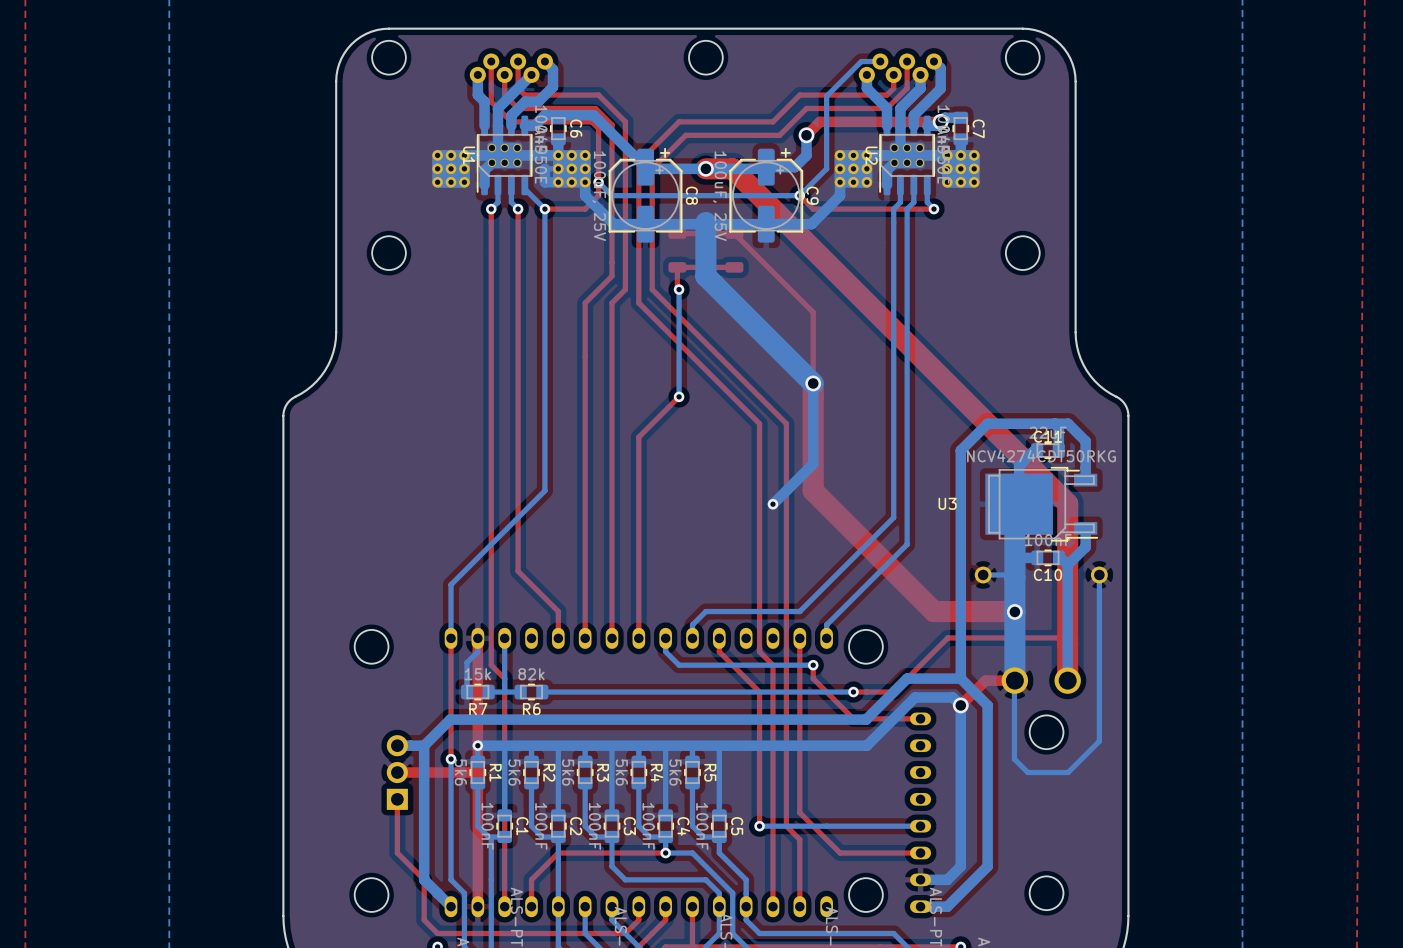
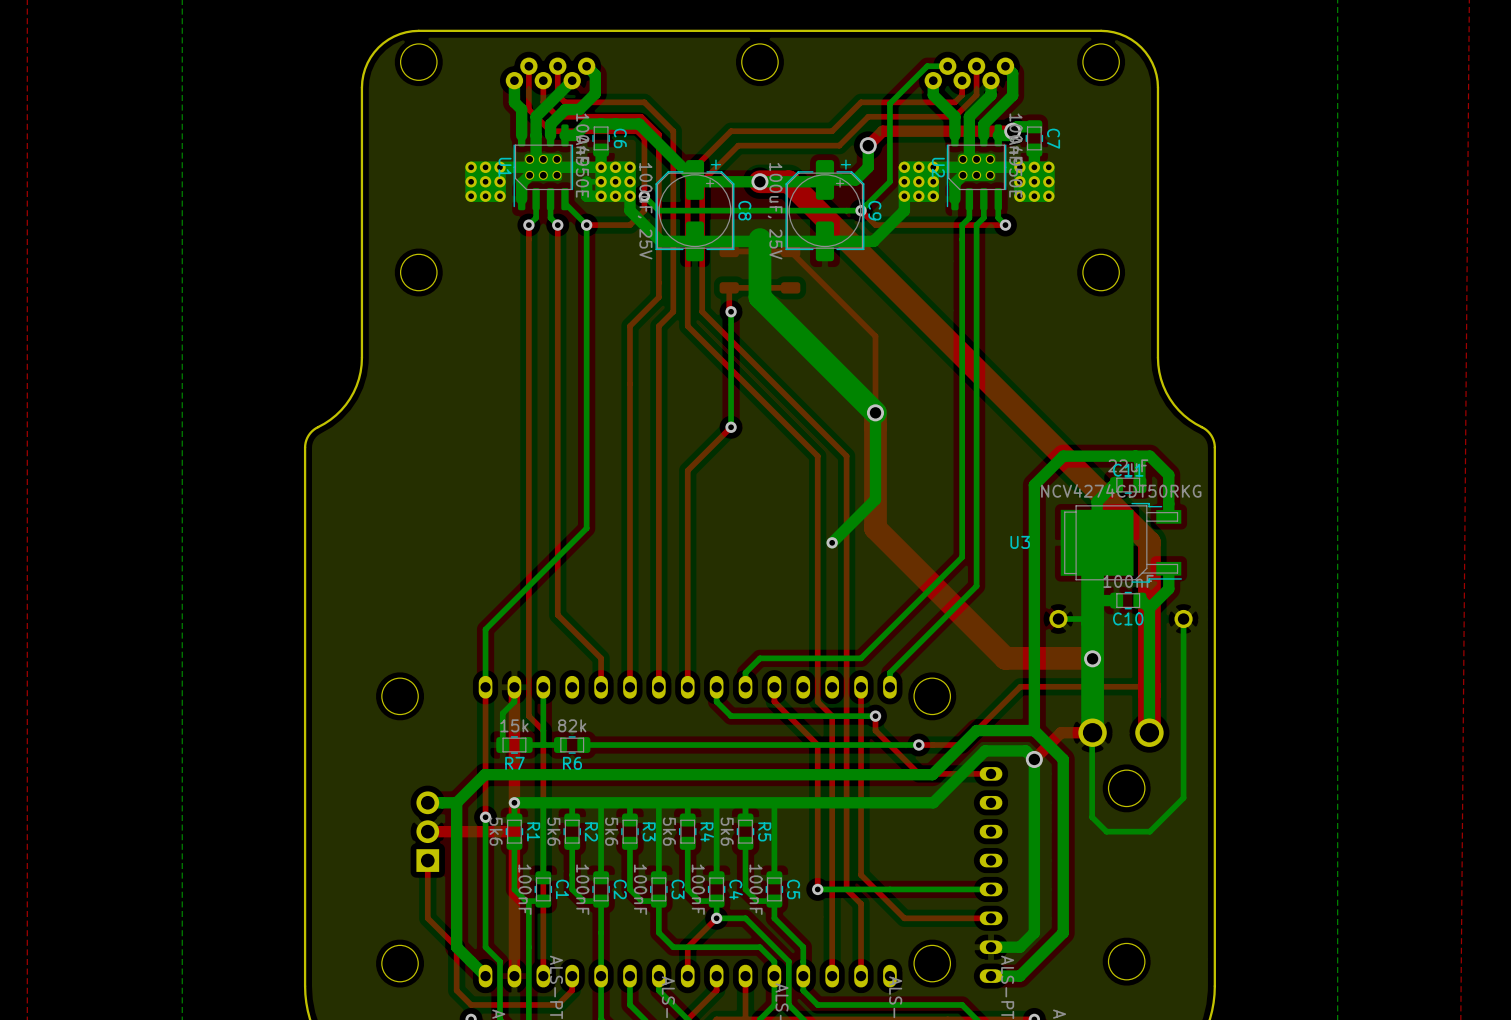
top track: (665, 853) (558, 853) (531, 879) (531, 906) -> (716, 918) (687, 947) (687, 976)
top track: (638, 906) (638, 920) (625, 933) (518, 933) -> (572, 976) (572, 990) (557, 1004)

